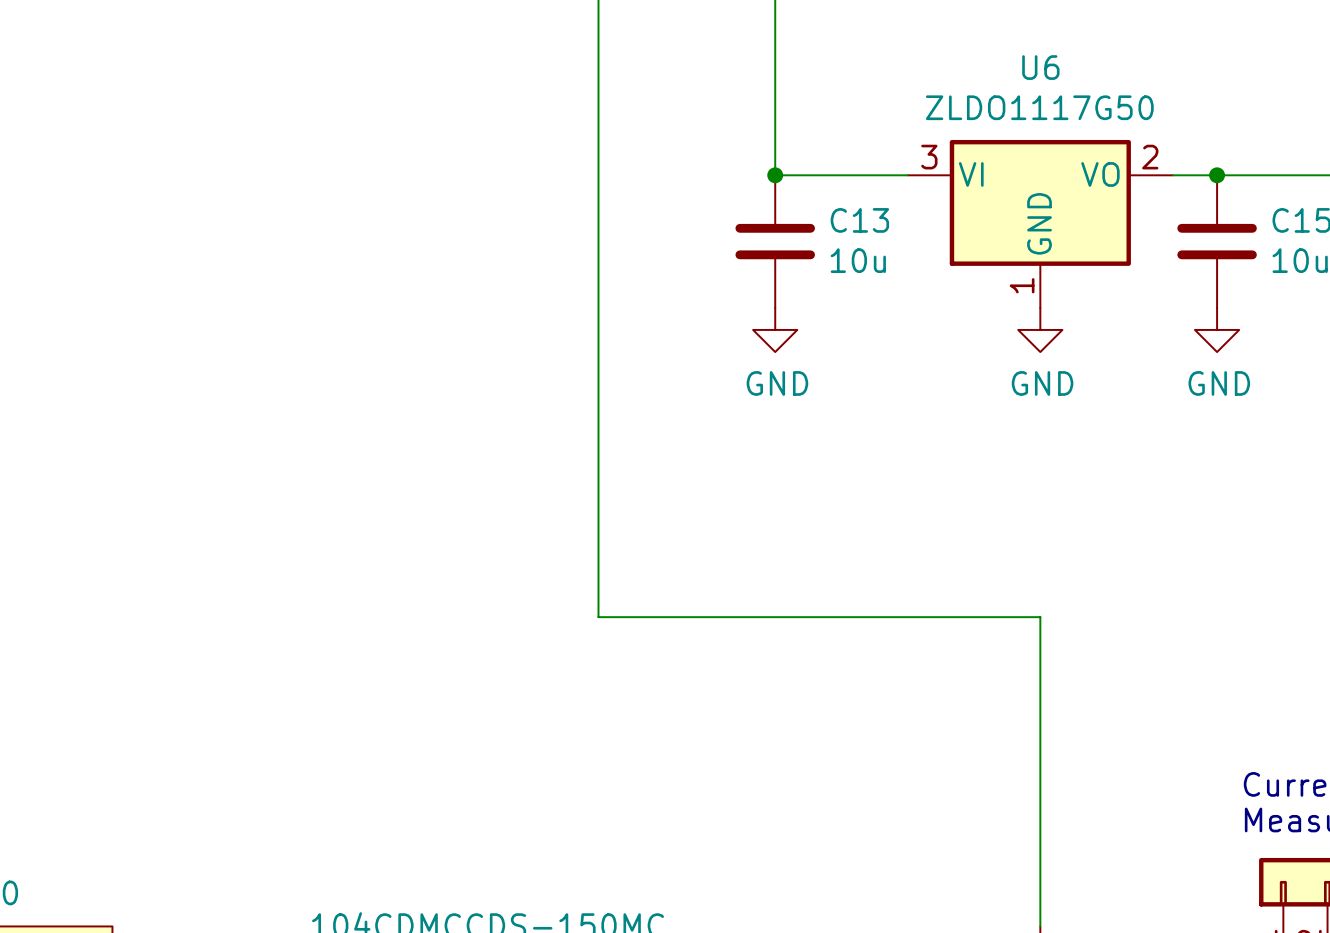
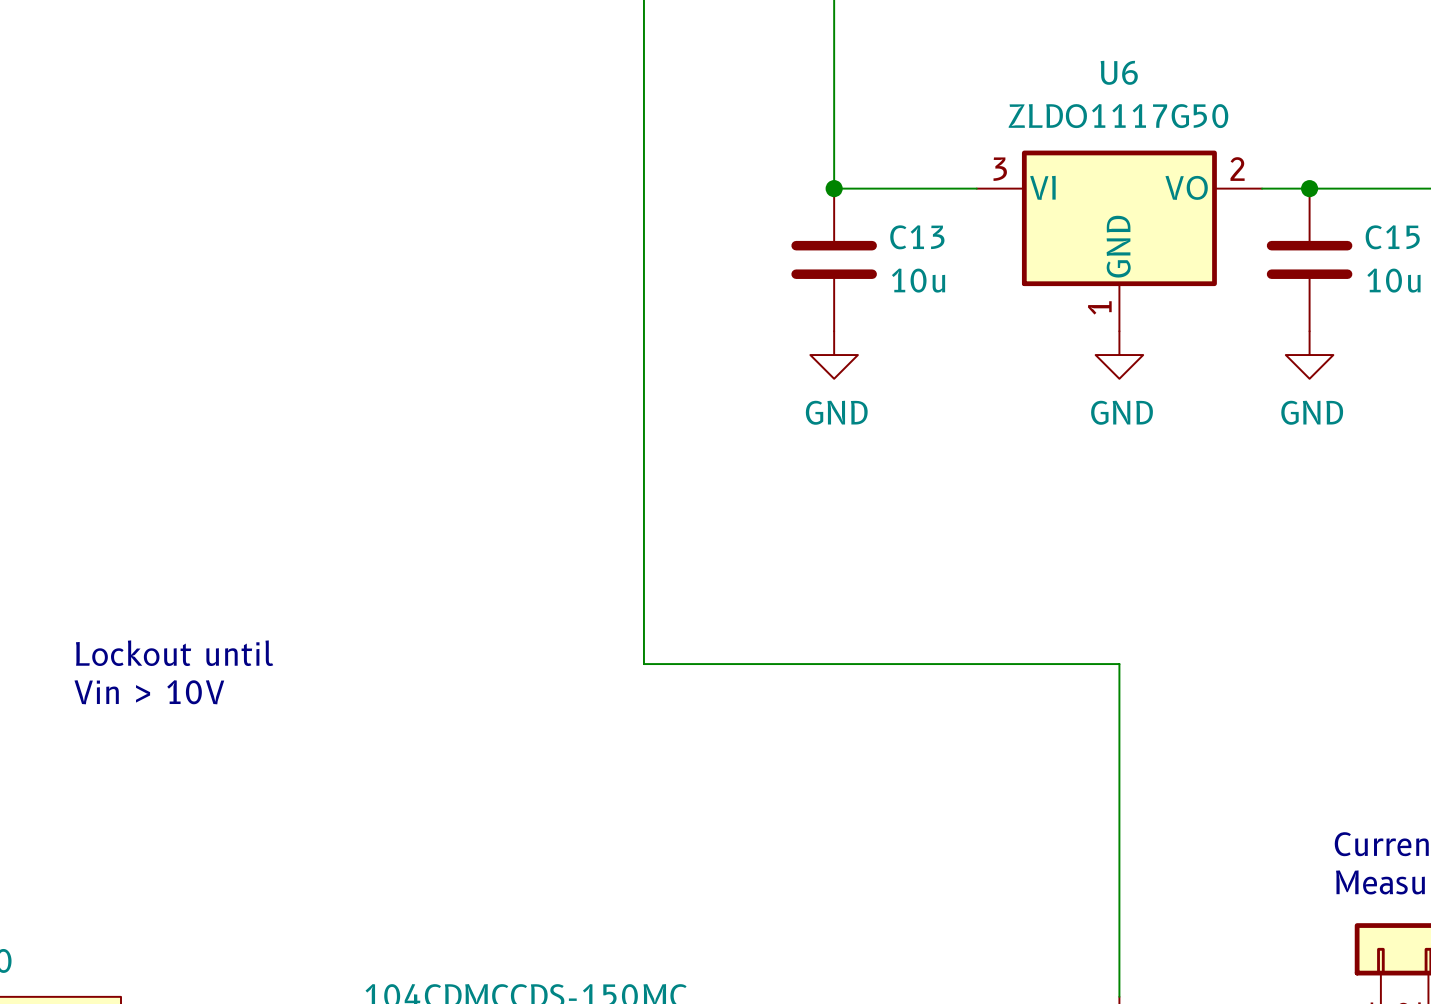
text: none -> Lockout until (174, 653)
text: none -> Vin > 10V (149, 692)

